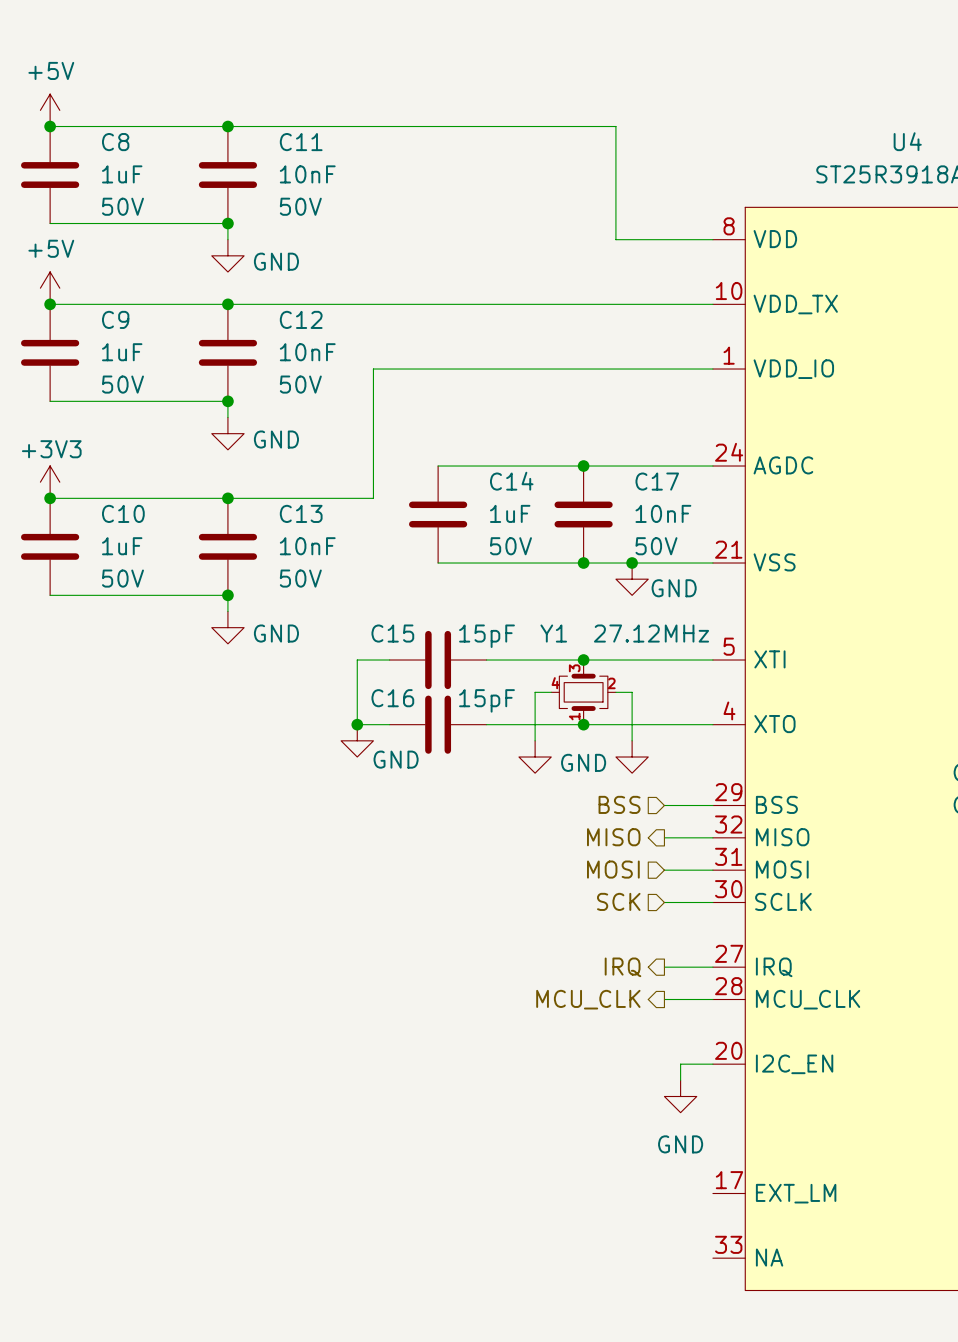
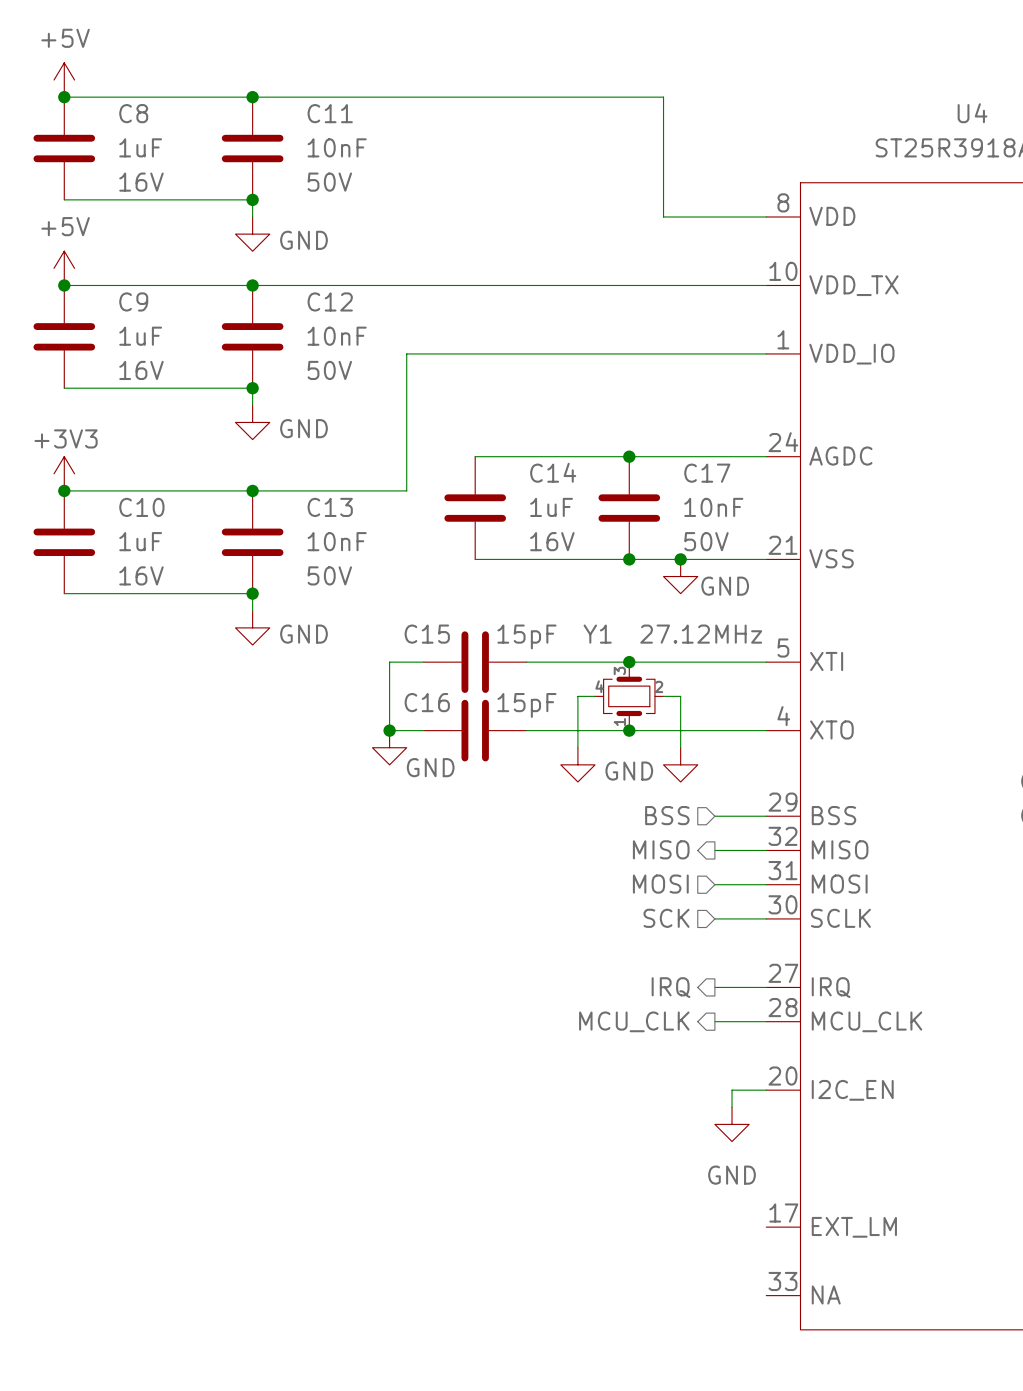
C8 text: 50V (122, 206) -> 16V (141, 182)
C9 text: 50V (122, 384) -> 16V (141, 370)
C14 text: 50V (510, 546) -> 16V (552, 541)
C10 text: 50V (122, 578) -> 16V (141, 575)

